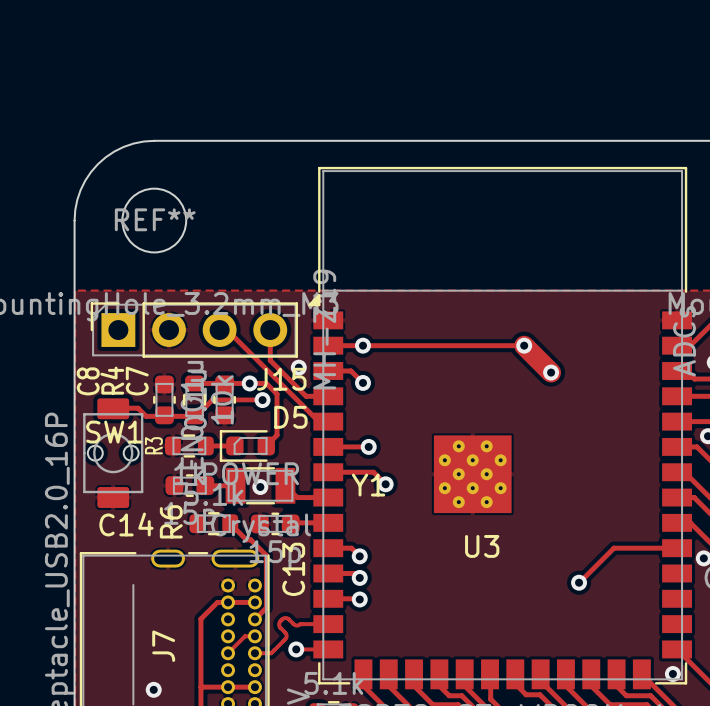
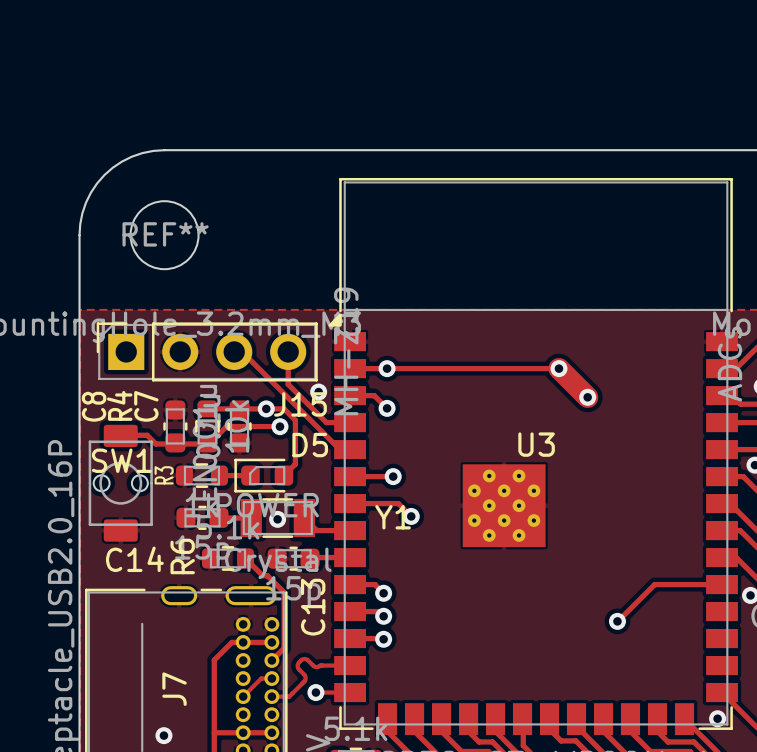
U3 name position: U3 (482, 546) -> U3 (536, 444)

